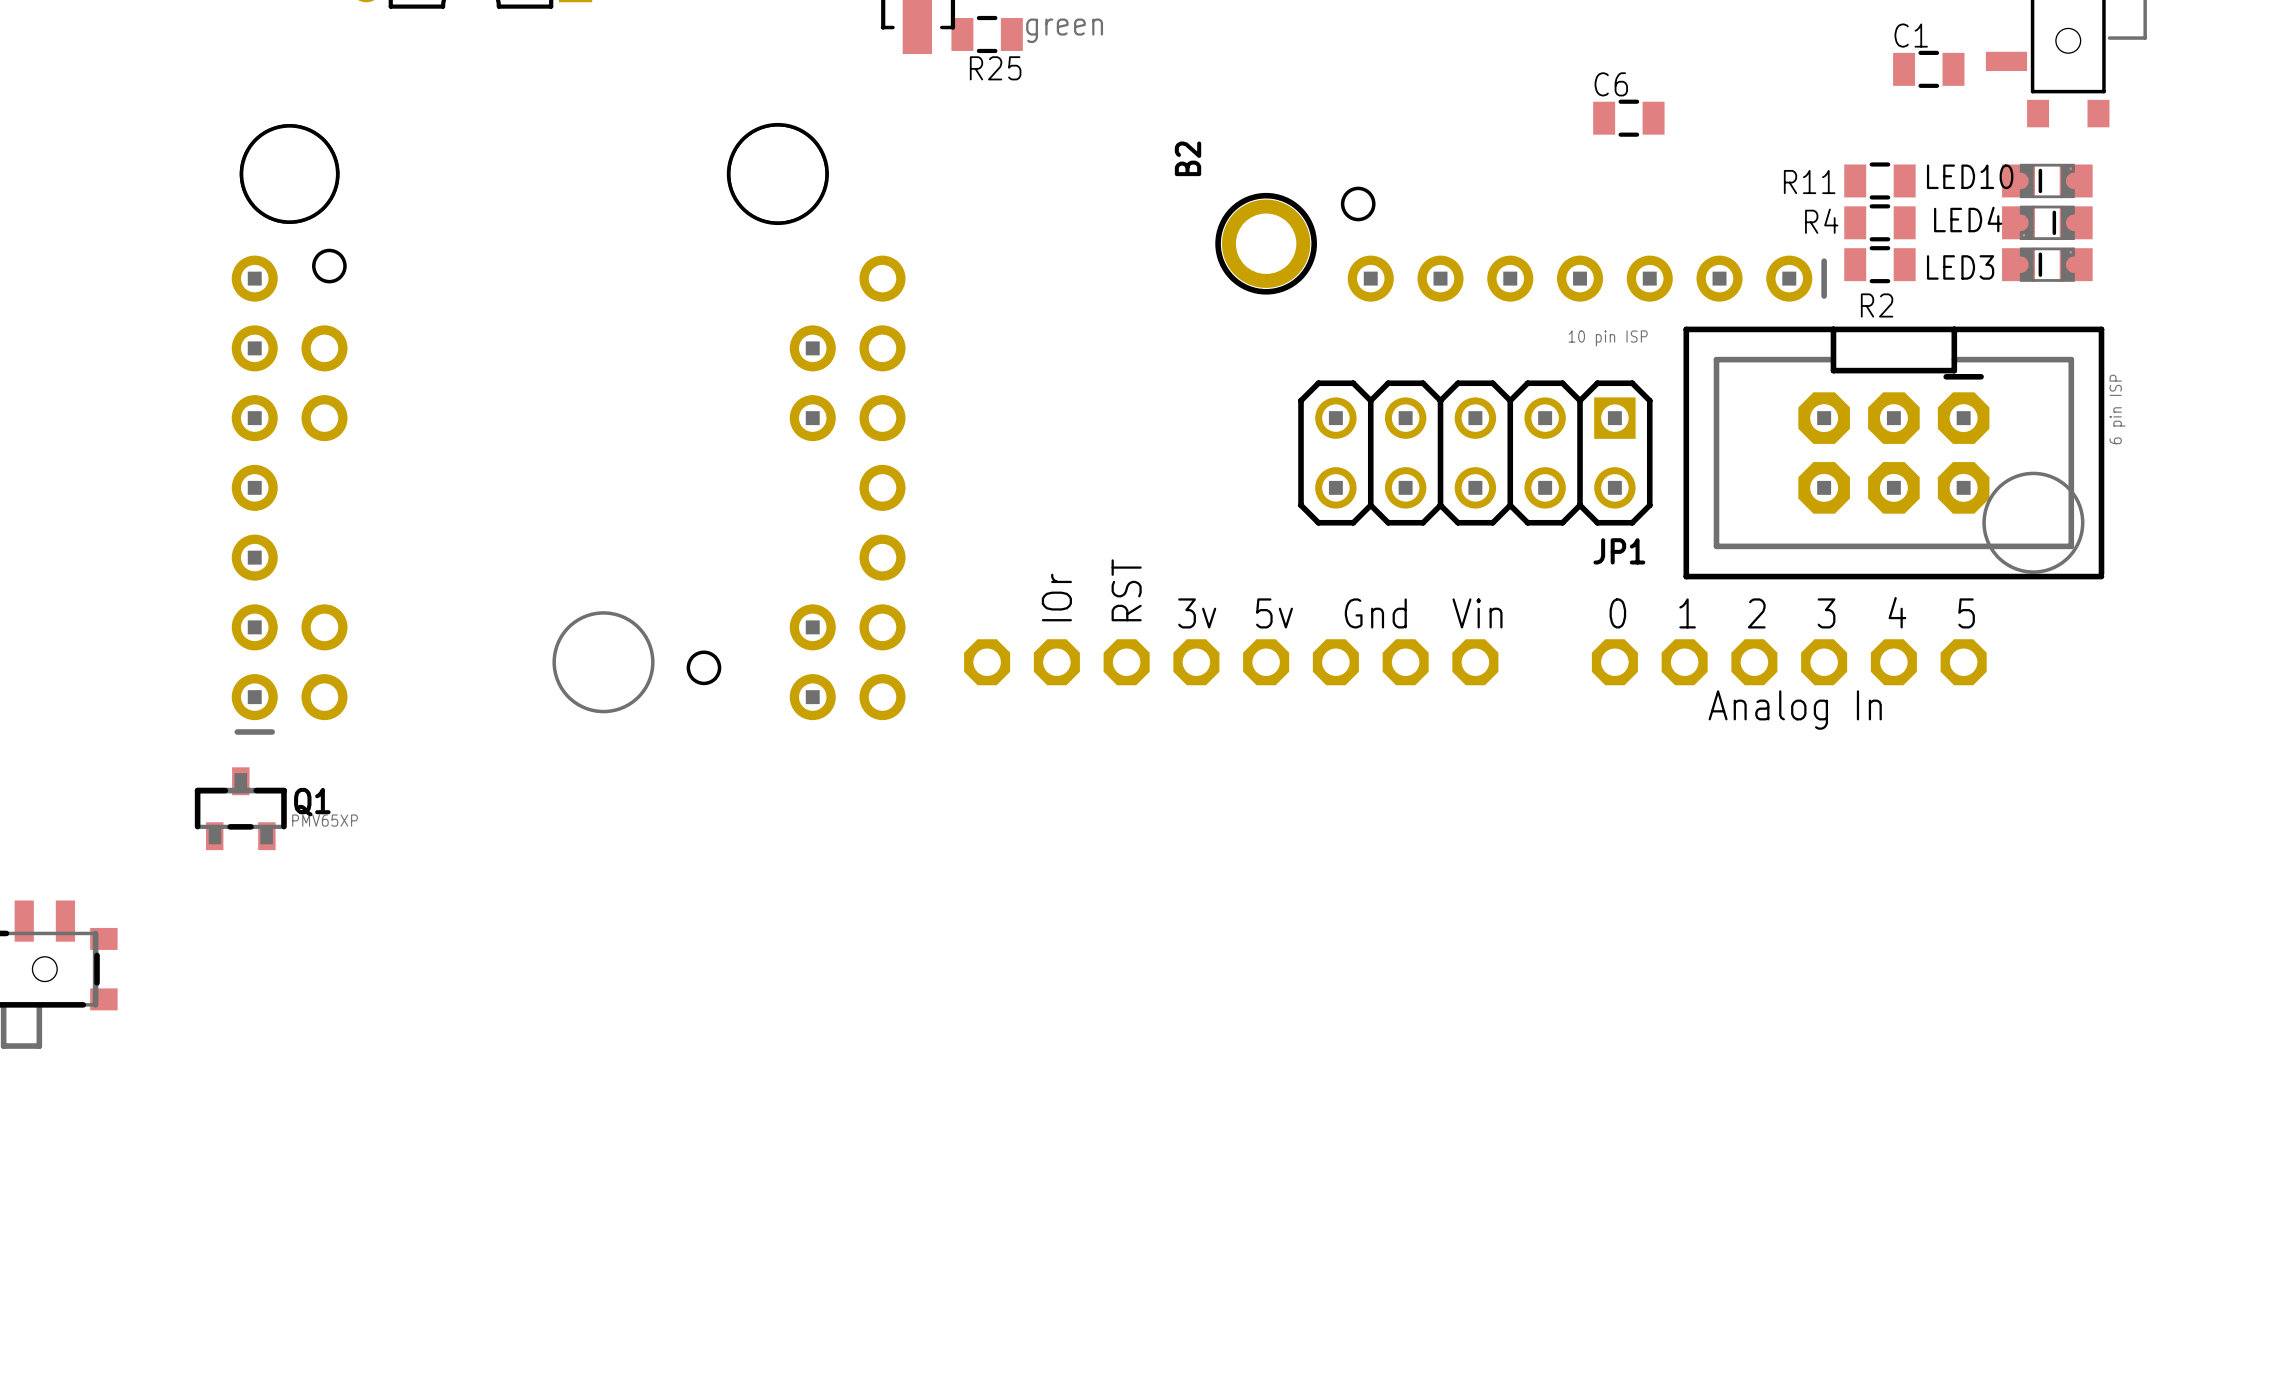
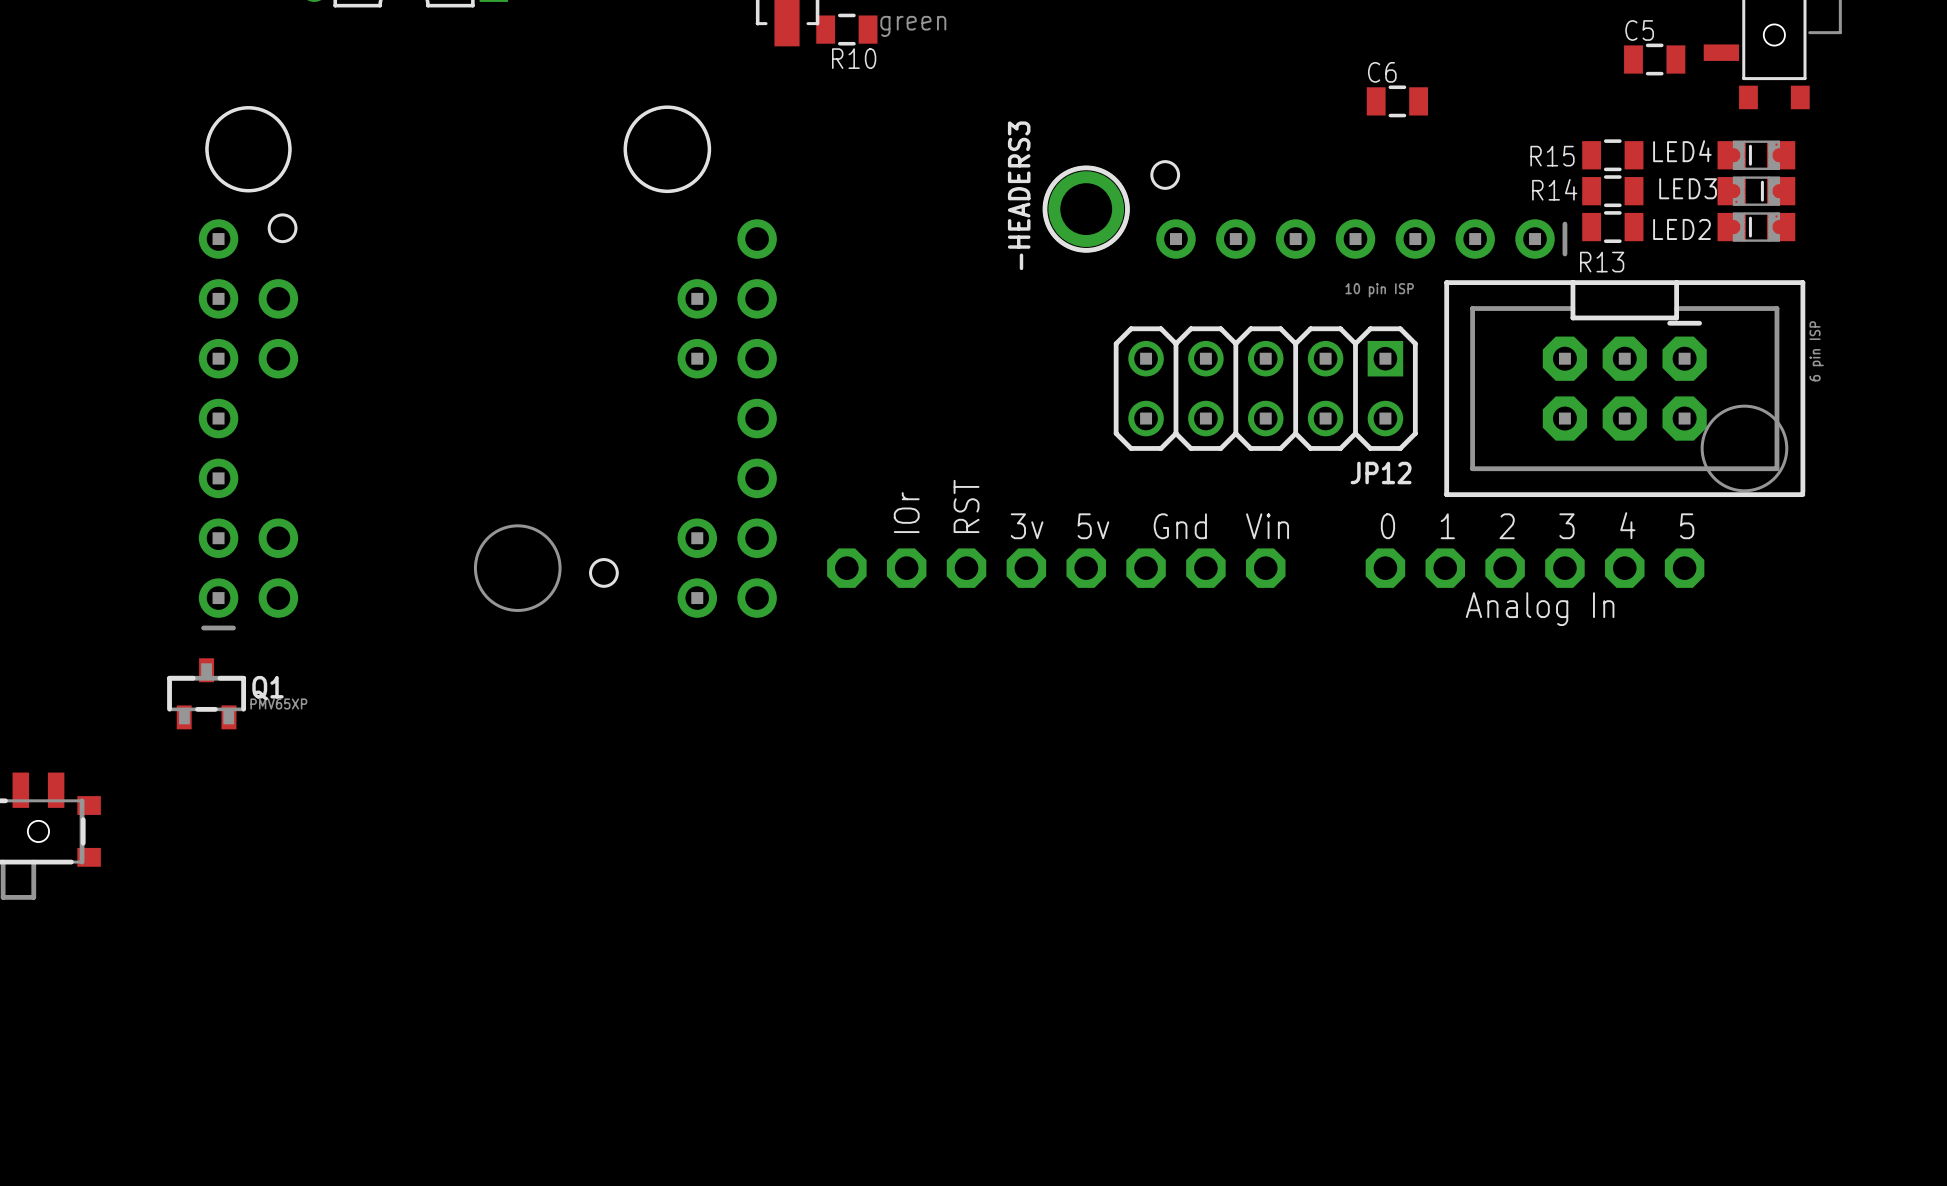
C1 name: C1 (1911, 35) -> C5 (1639, 30)
R25 name: R25 (995, 68) -> R10 (854, 58)
B2 name: B2 (1188, 158) -> -HEADERS3 (1019, 195)
LED10 name: LED10 (1970, 176) -> LED4 (1682, 151)
R11 name: R11 (1809, 182) -> R15 (1552, 156)
LED4 name: LED4 (1968, 219) -> LED3 (1688, 188)
R4 name: R4 (1821, 221) -> R14 (1554, 189)
LED3 name: LED3 (1960, 267) -> LED2 (1681, 229)
R2 name: R2 (1877, 305) -> R13 (1602, 262)
JP1 name: JP1 (1619, 551) -> JP12 (1381, 473)

